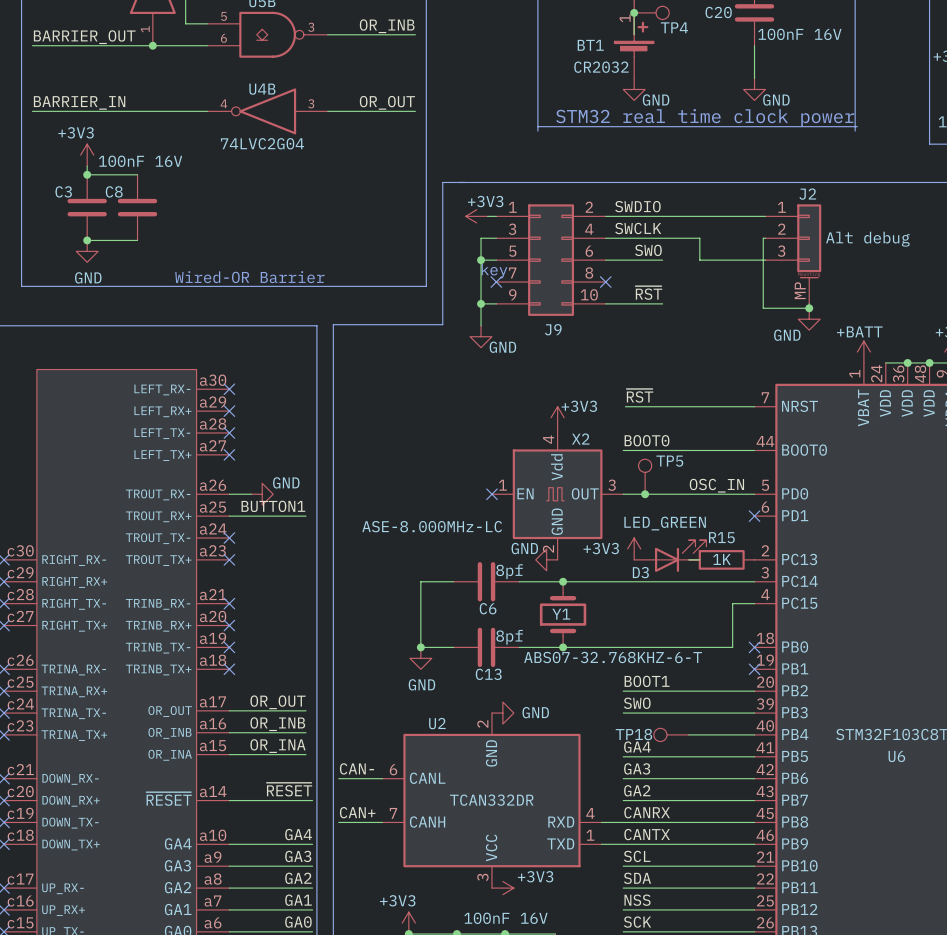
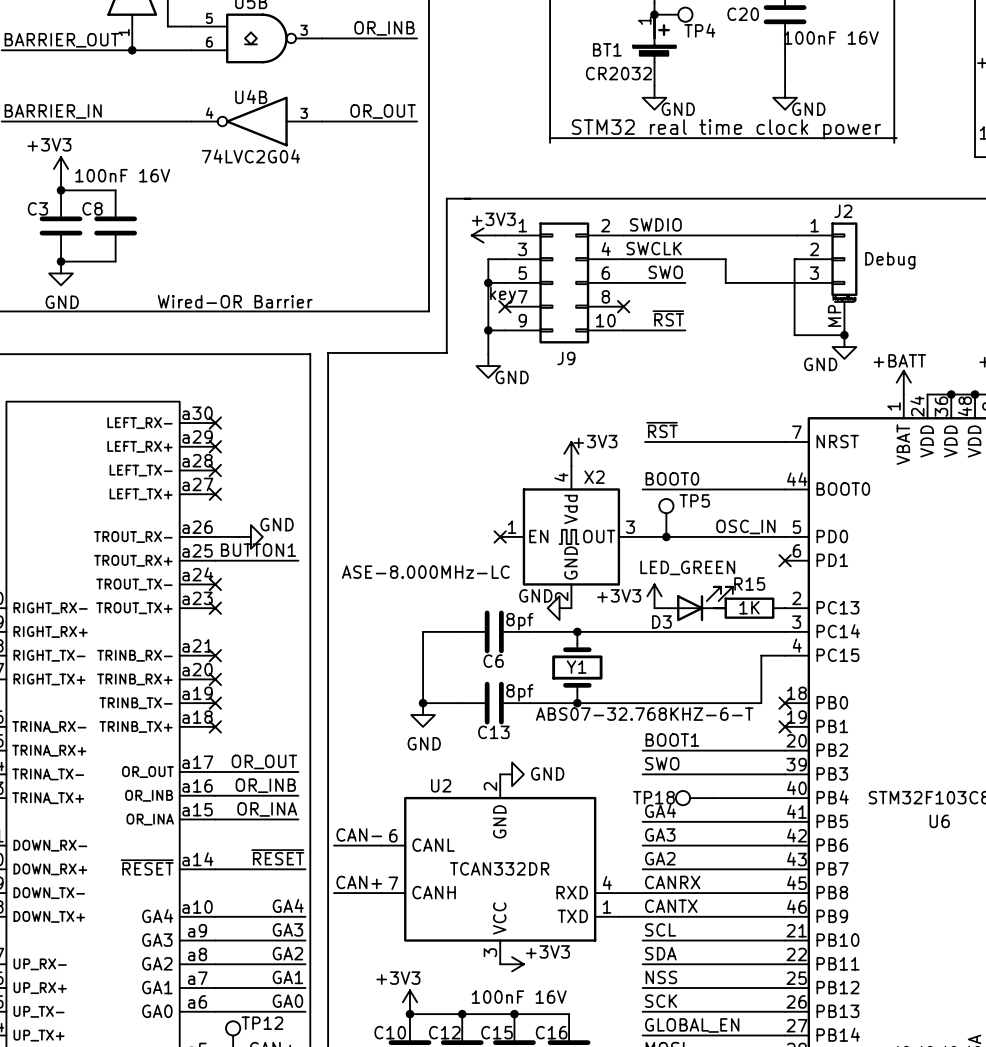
J2 value: Alt debug (867, 239) -> Debug (890, 260)

